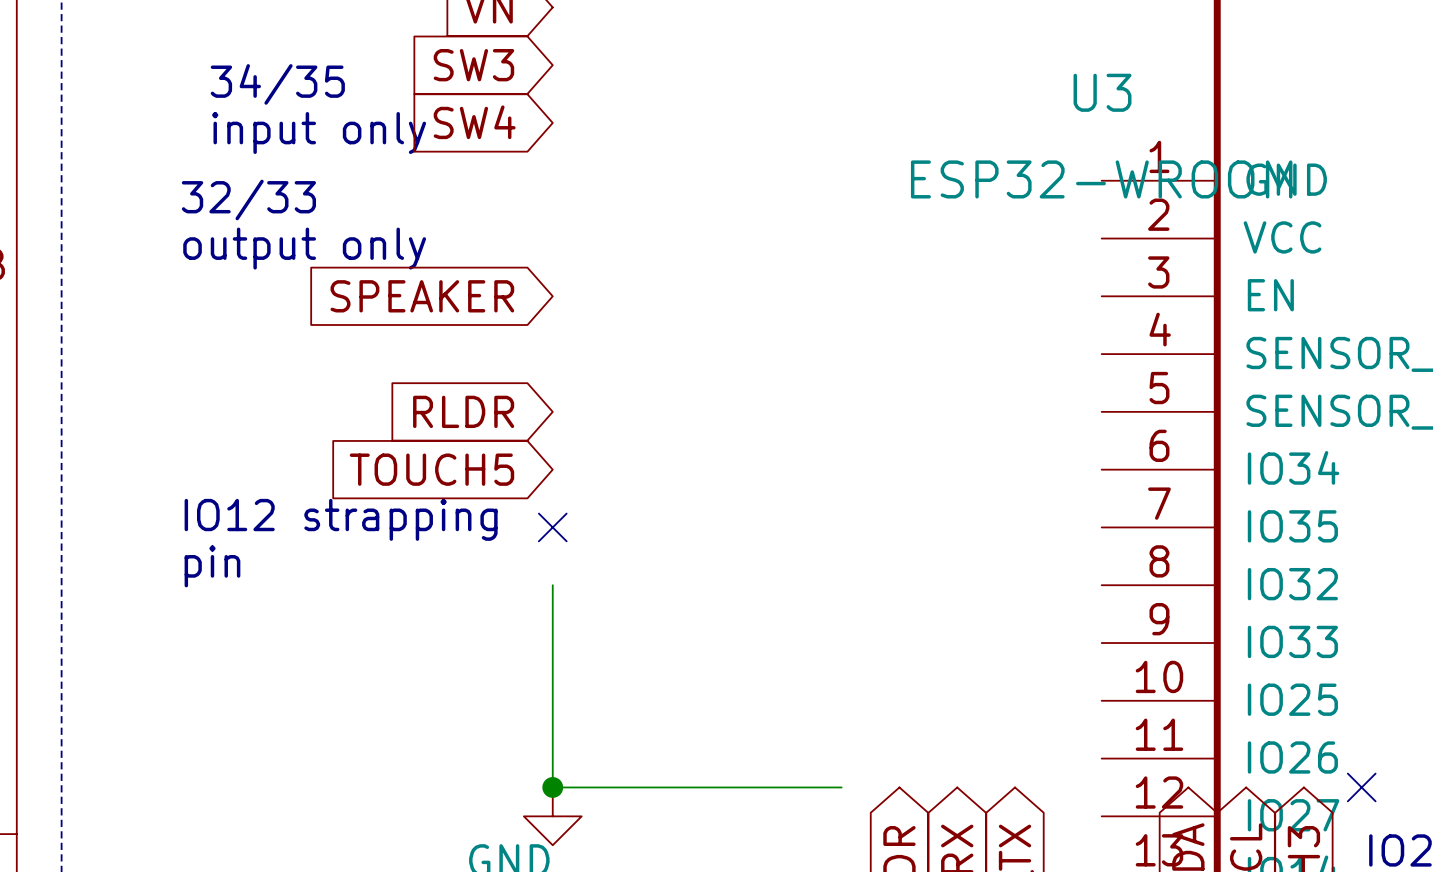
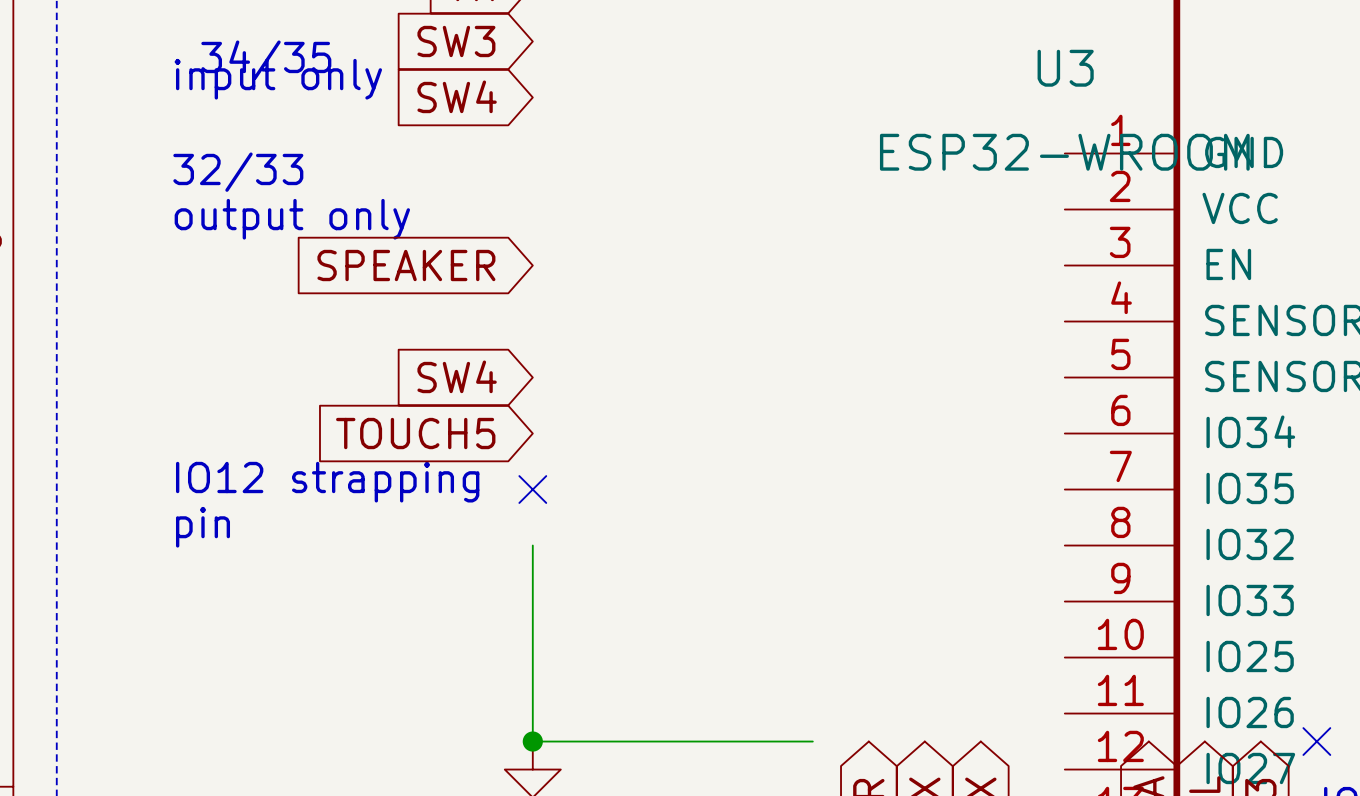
text position: input only (319, 133) -> input only (278, 79)
global label: RLDR (463, 411) -> SW4 (457, 376)

